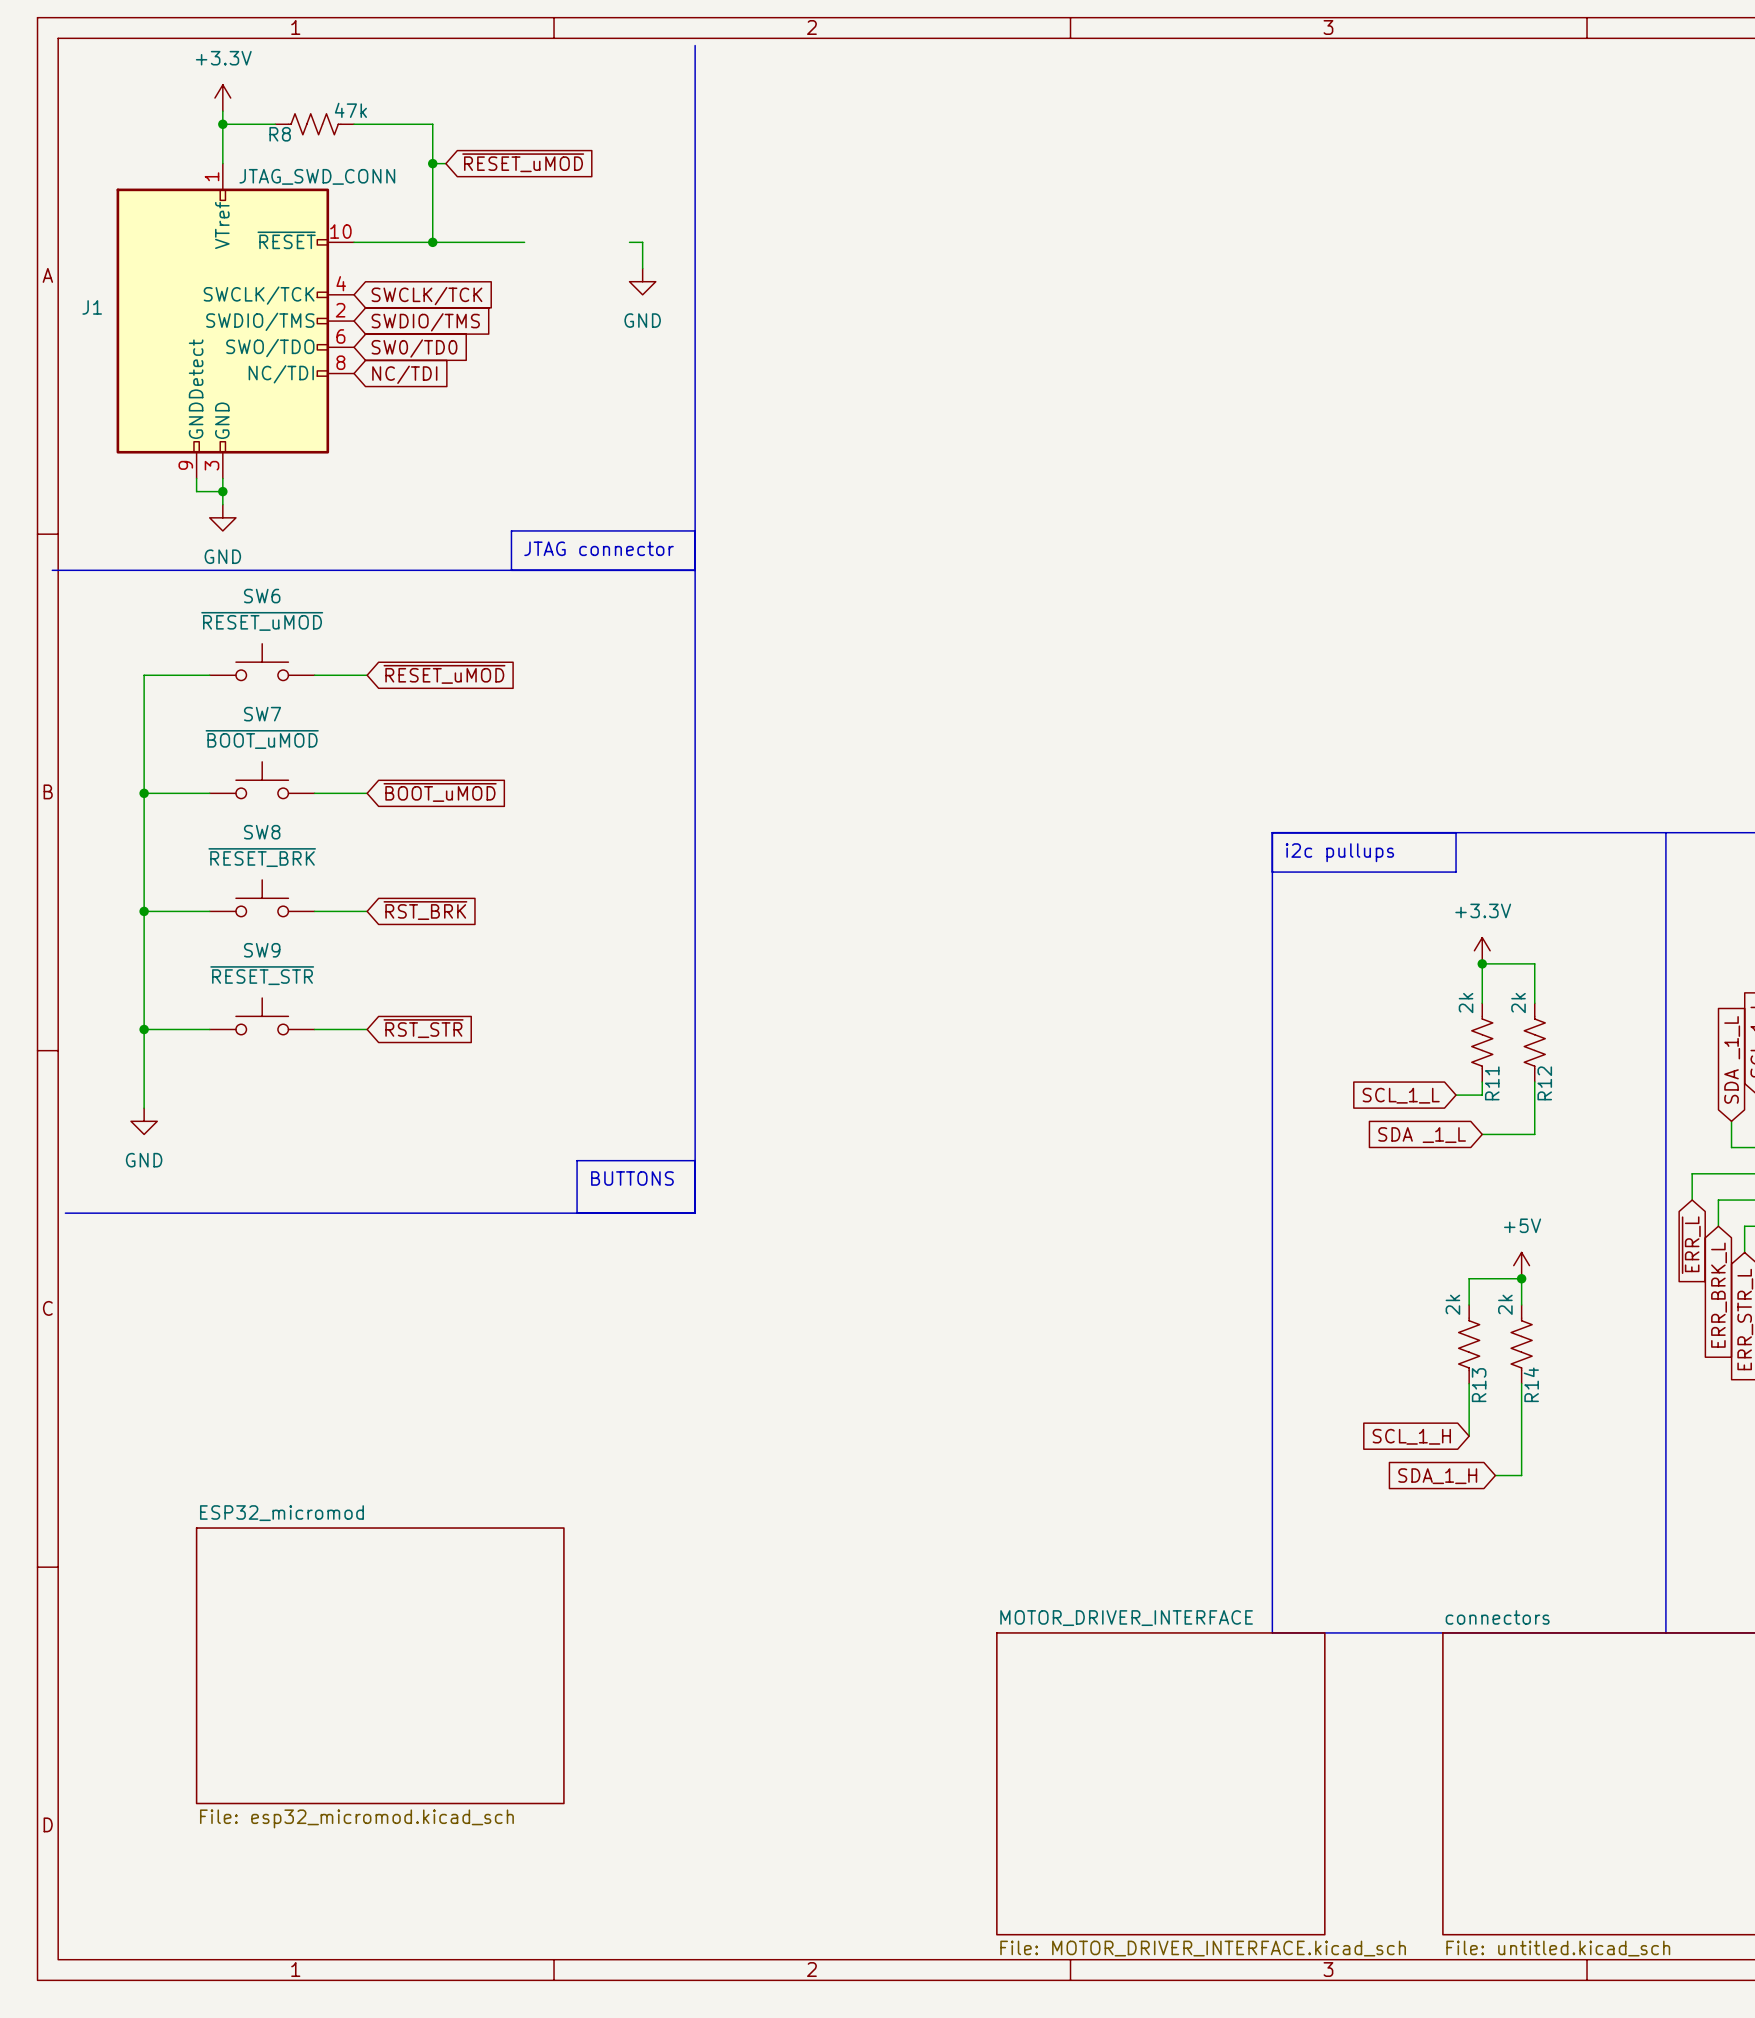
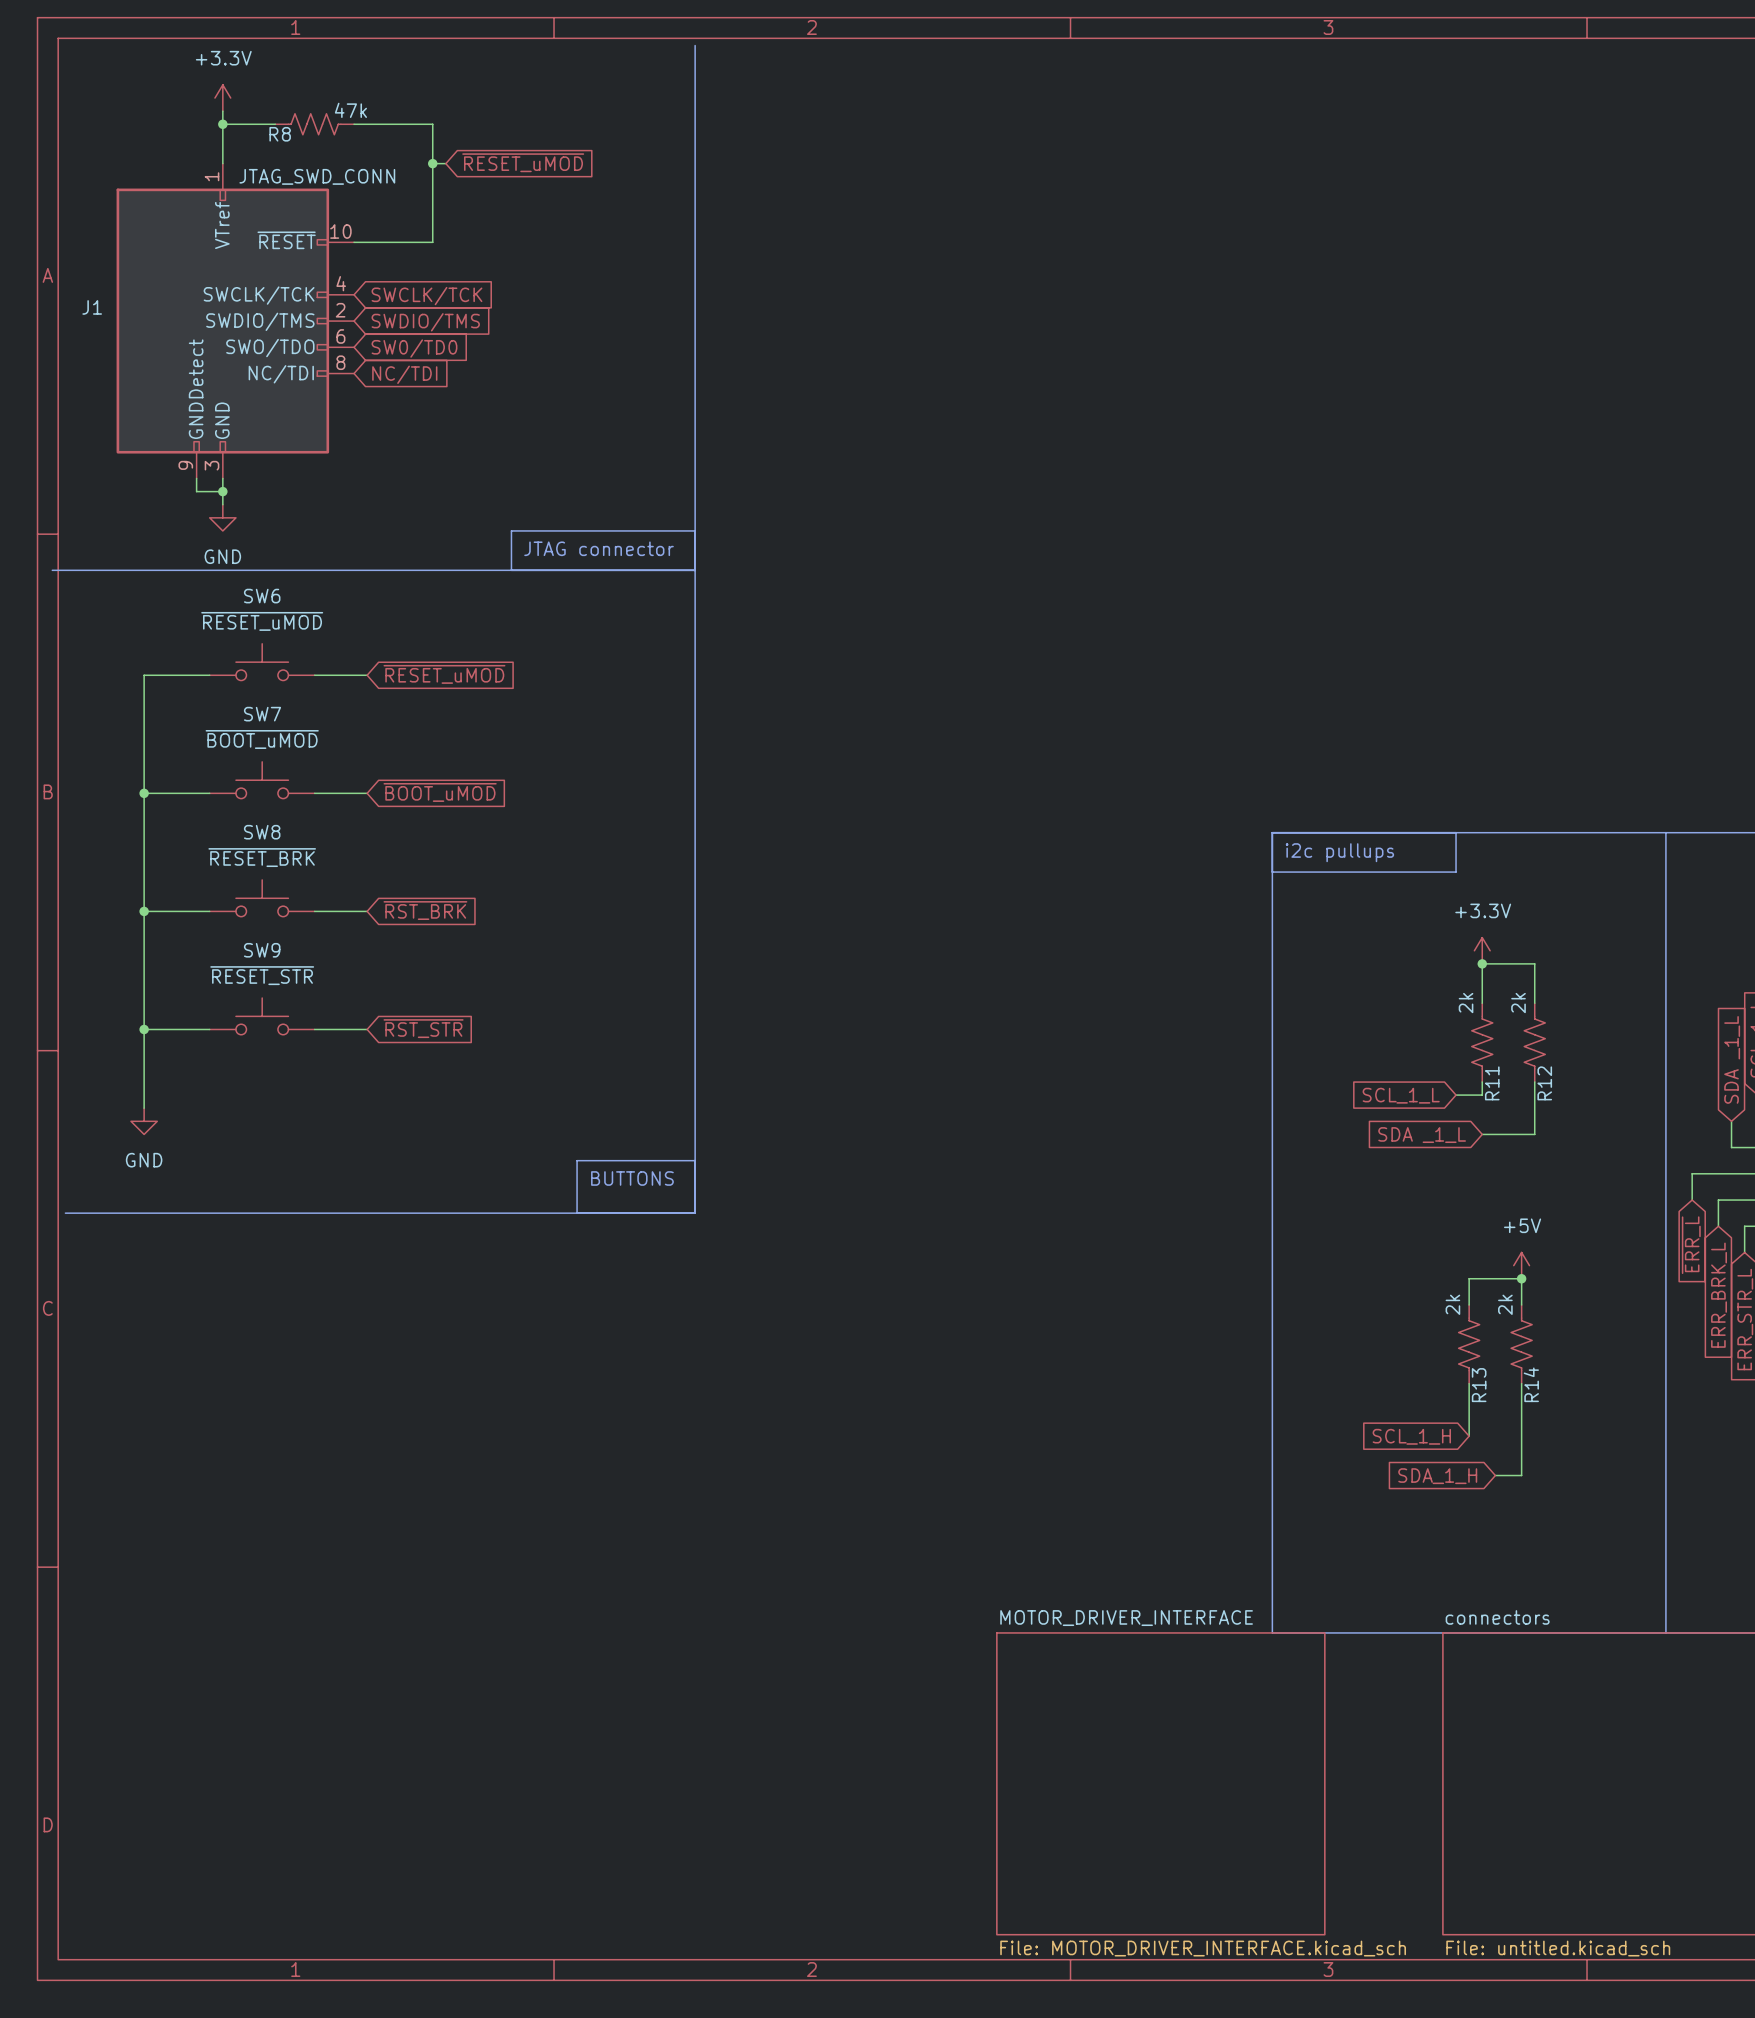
wire: (432, 242) (524, 242) -> none
junction: (432, 242) -> none
wire: (629, 242) (642, 242) (642, 268) -> none
power symbol: GND (642, 281) -> none
sheet ESP32_micromod: File: esp32_micromod.kicad_sch (380, 1665) -> none

